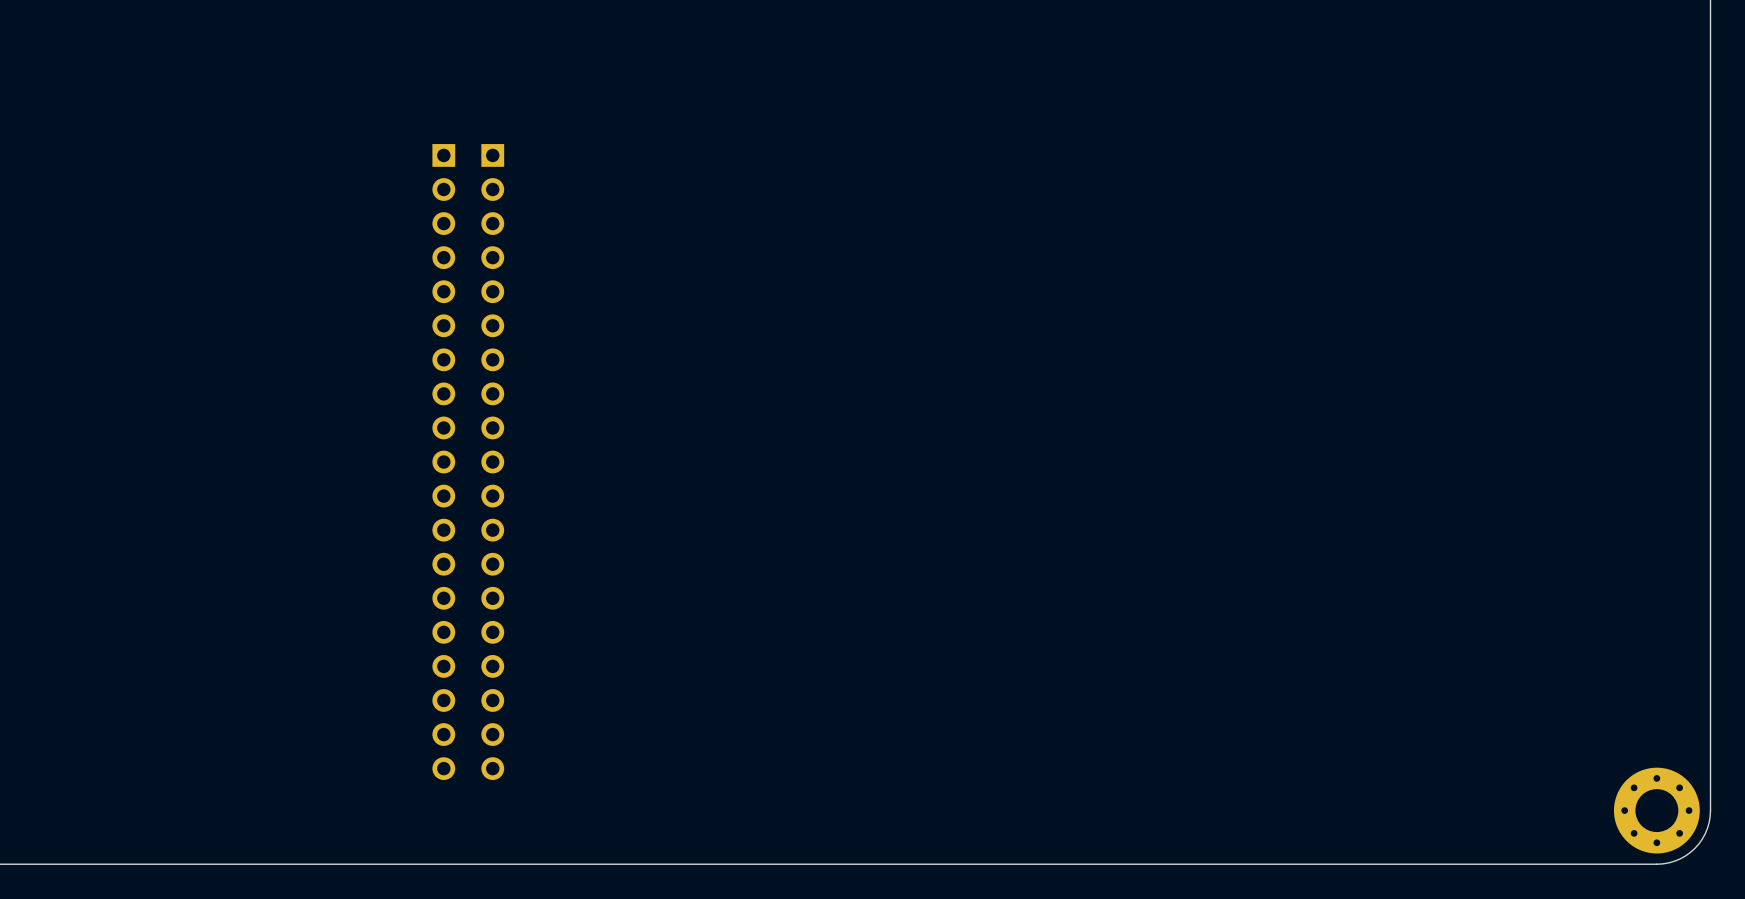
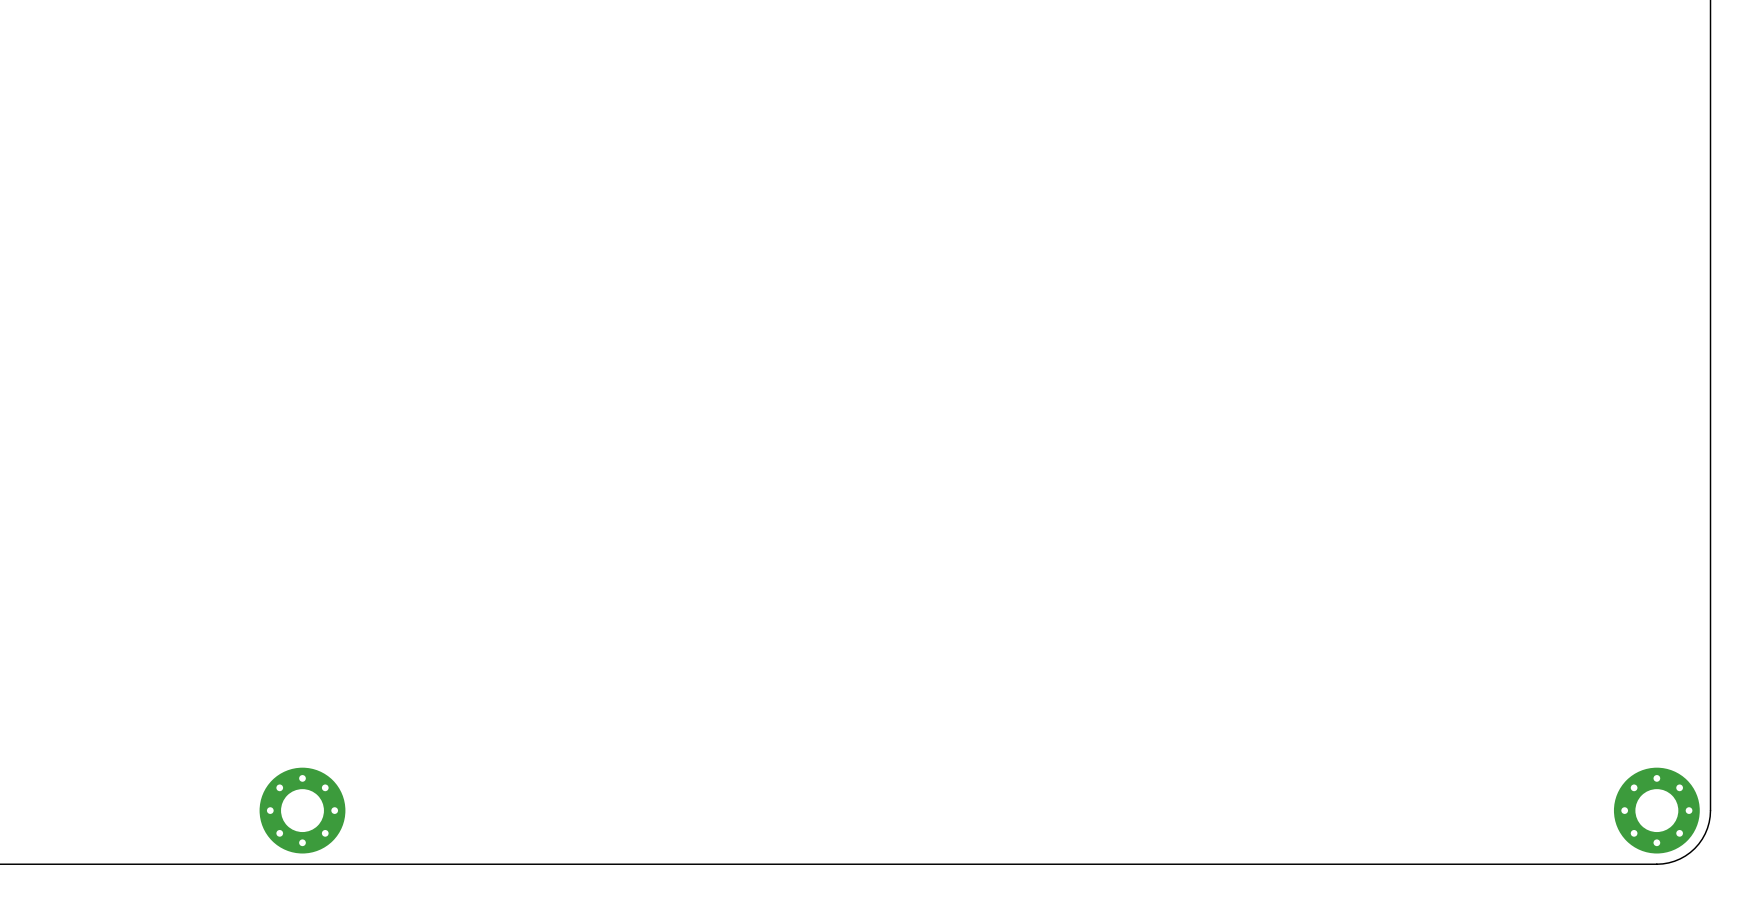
part: (443, 462) -> none
part: (492, 462) -> none
part: none -> (302, 810)

